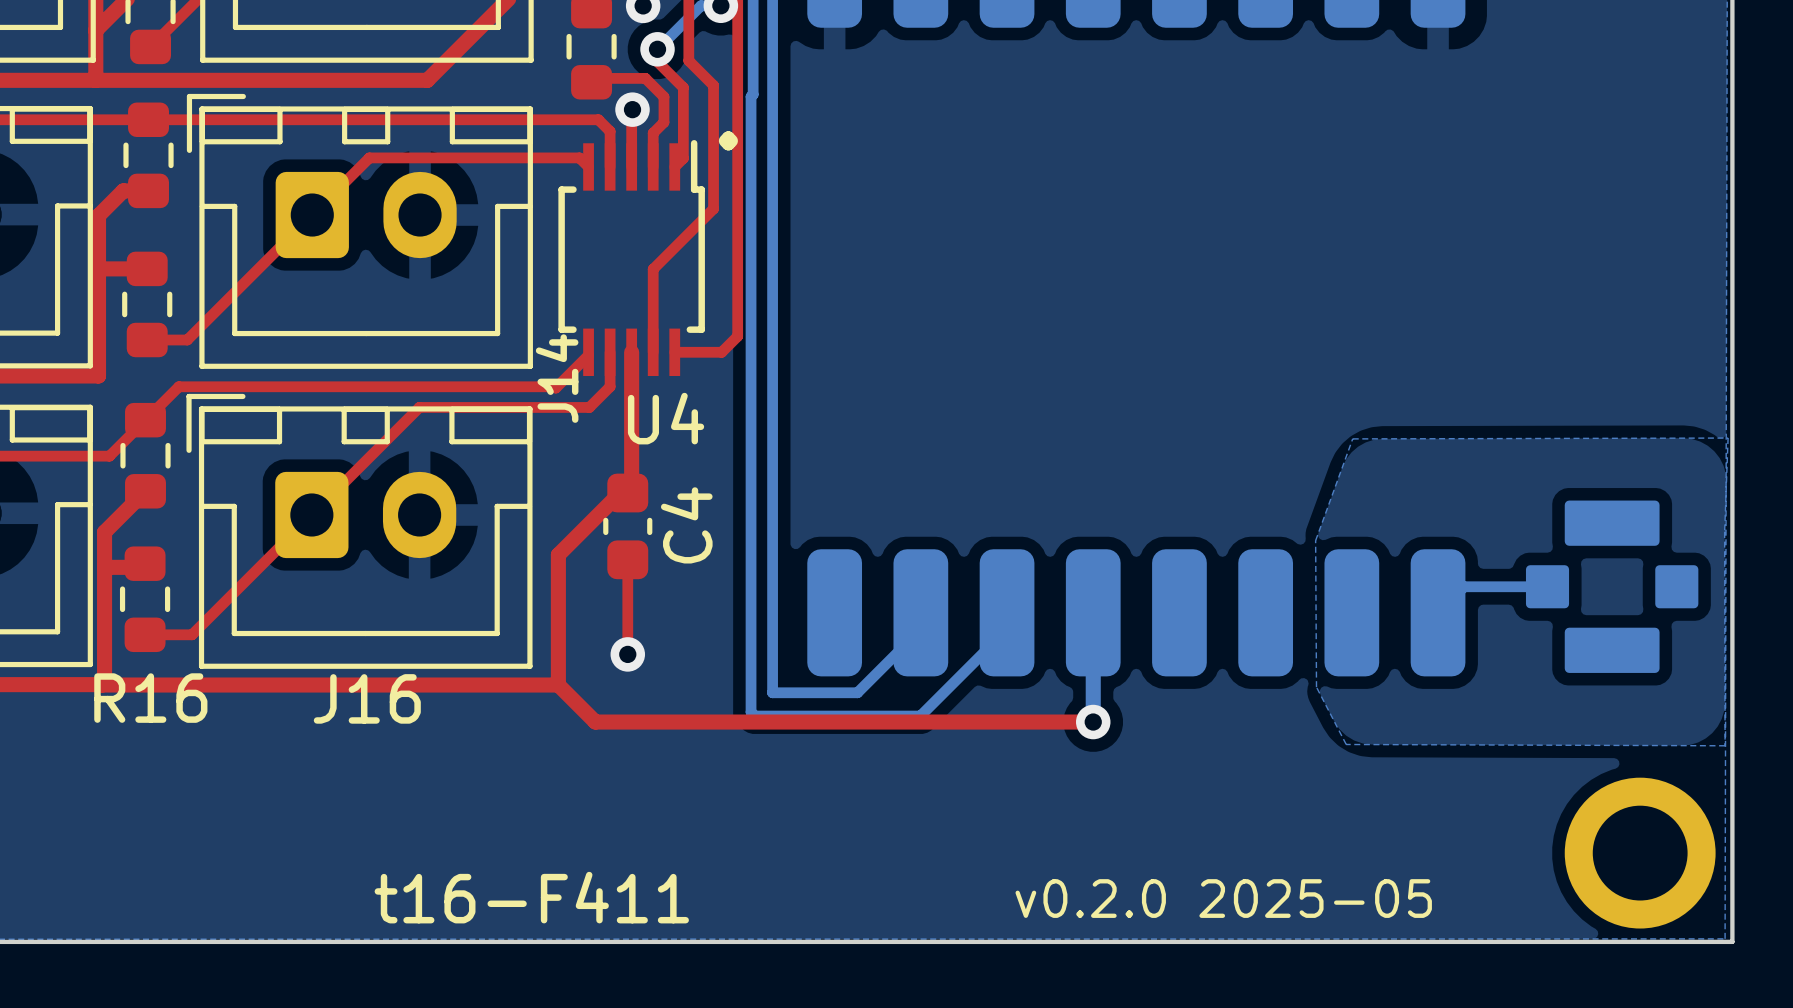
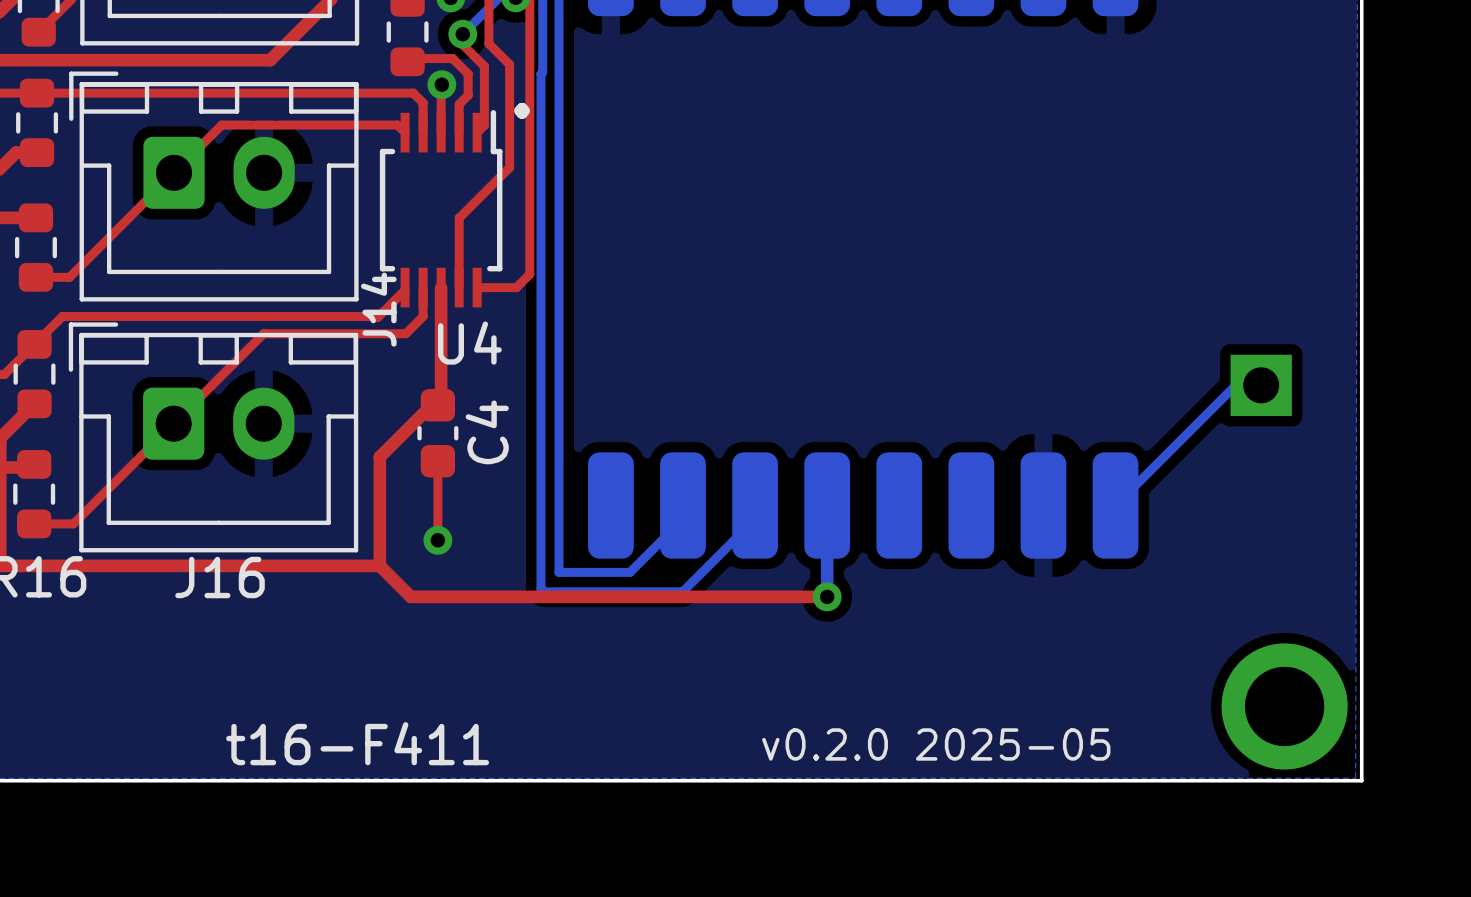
part: none -> (1261, 385)
bottom zone outline: (1724, 531) (1728, 438) (1352, 438) (1315, 540) (1316, 687) (1346, 744) (1725, 745) (1724, 532) -> none
bottom track: (1464, 586) (1547, 586) -> (1137, 483) (1235, 385)
part: (1612, 586) -> none

